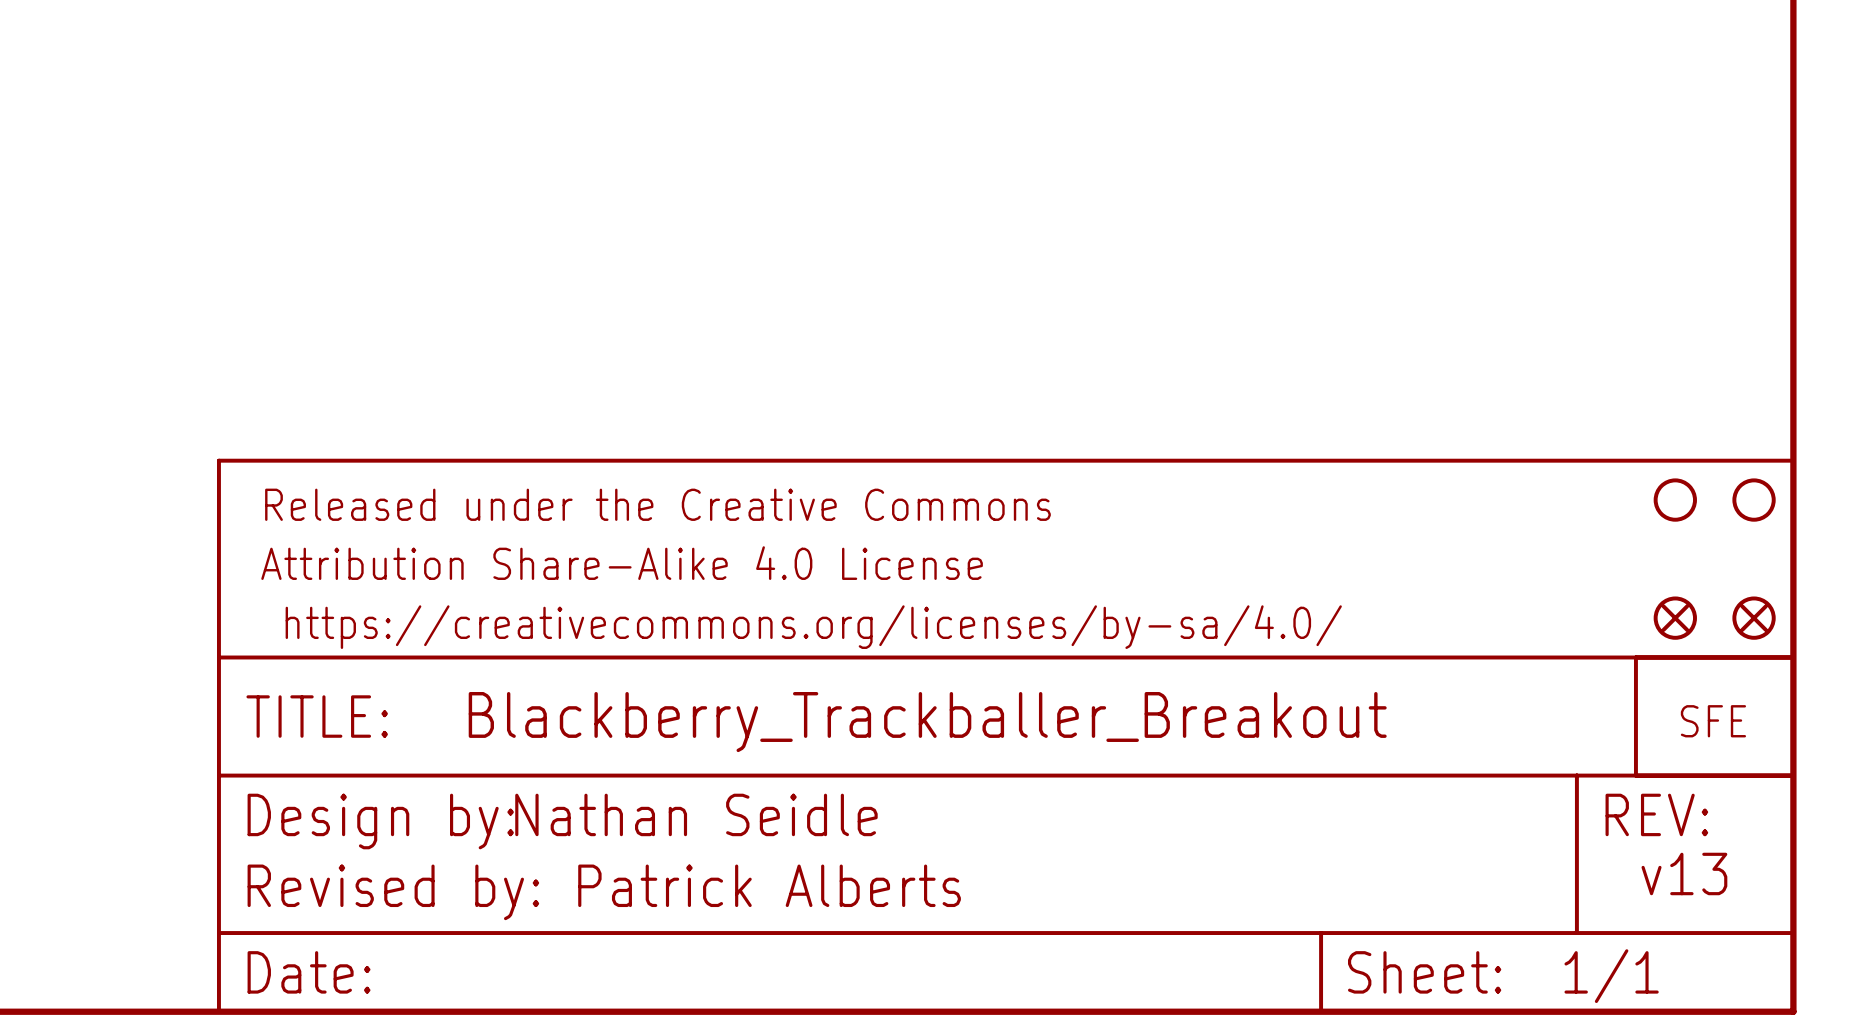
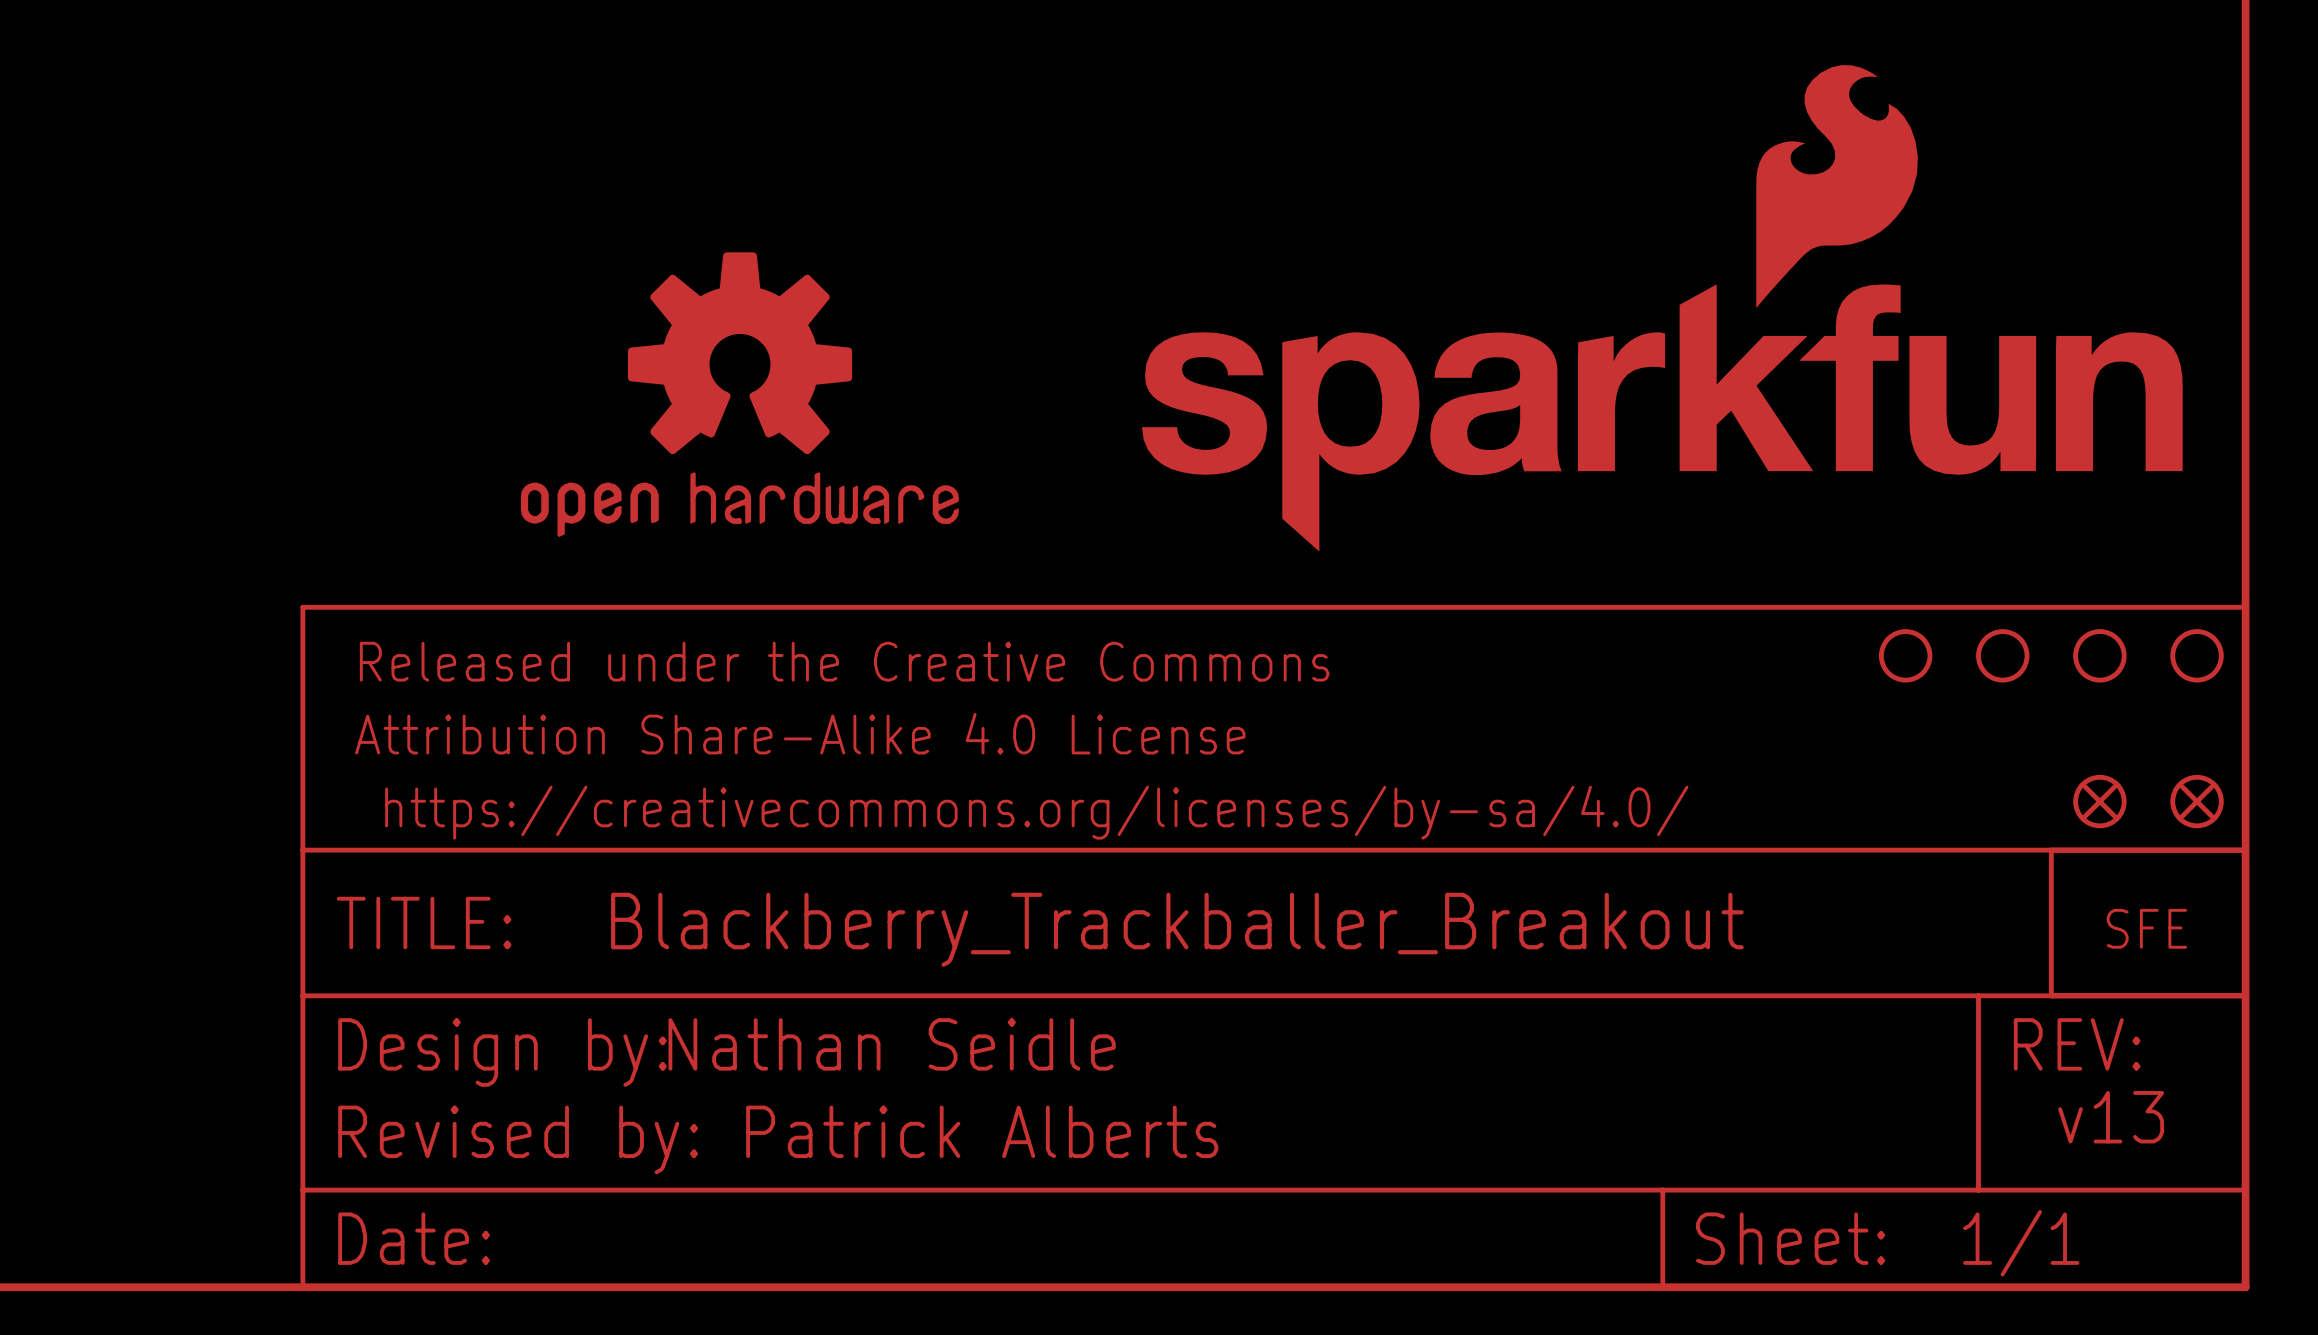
part: none -> (1662, 308)
part: none -> (739, 394)
part: none -> (1905, 655)
part: none -> (2002, 655)

